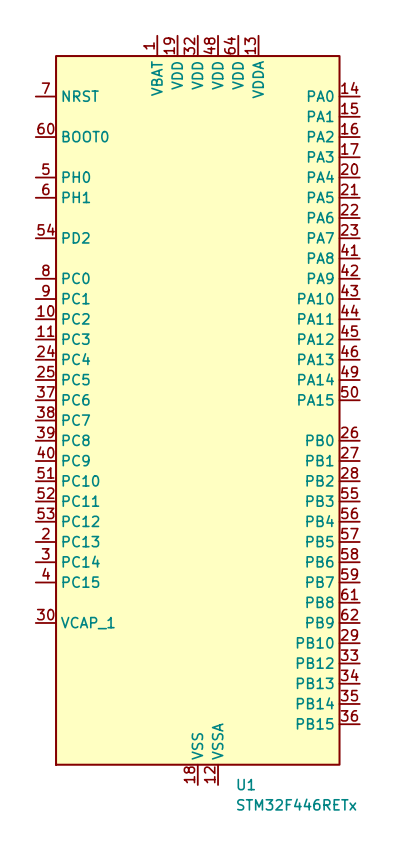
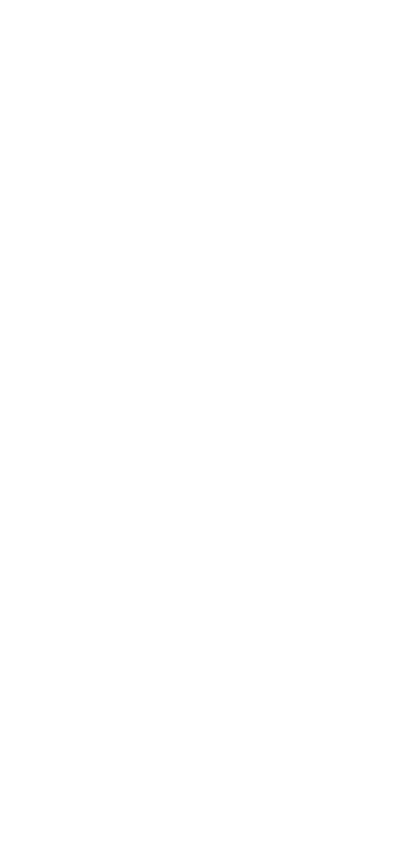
U1: STM32F446RETx (197, 410) -> none

